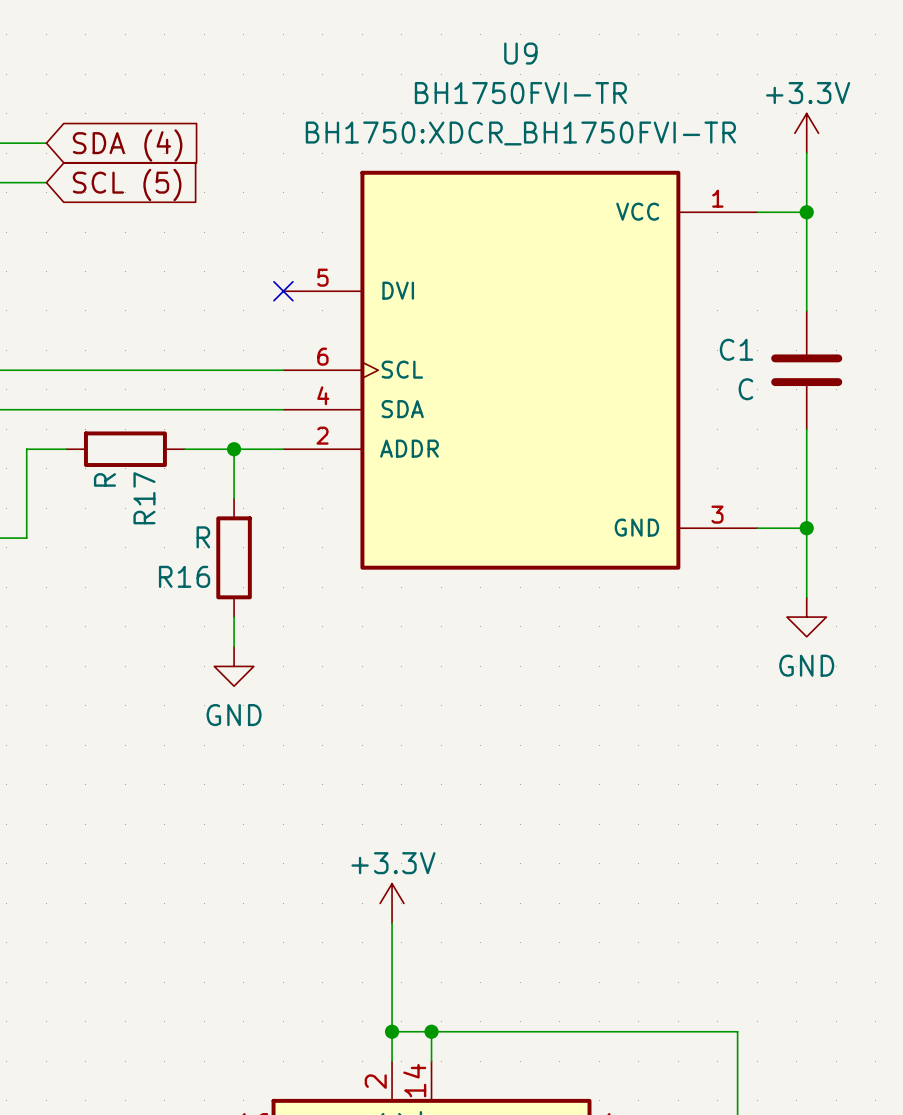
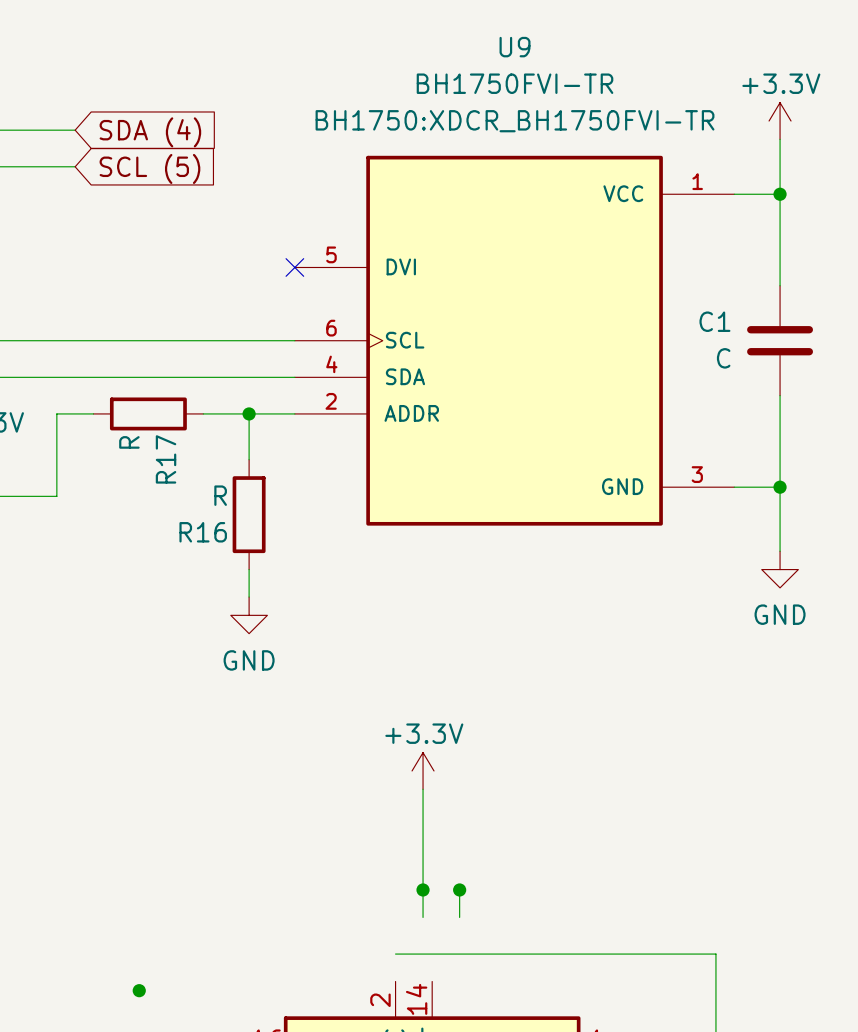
power symbol position: +3.3V (392, 903) -> +3.3V (423, 770)
wire: (392, 923) (392, 1061) -> (423, 789) (423, 917)
junction: none -> (423, 889)
junction: none -> (459, 889)
junction: (392, 1031) -> none
wire: (431, 1031) (431, 1061) -> (459, 889) (459, 917)
junction: (431, 1031) -> none
junction: none -> (139, 990)

